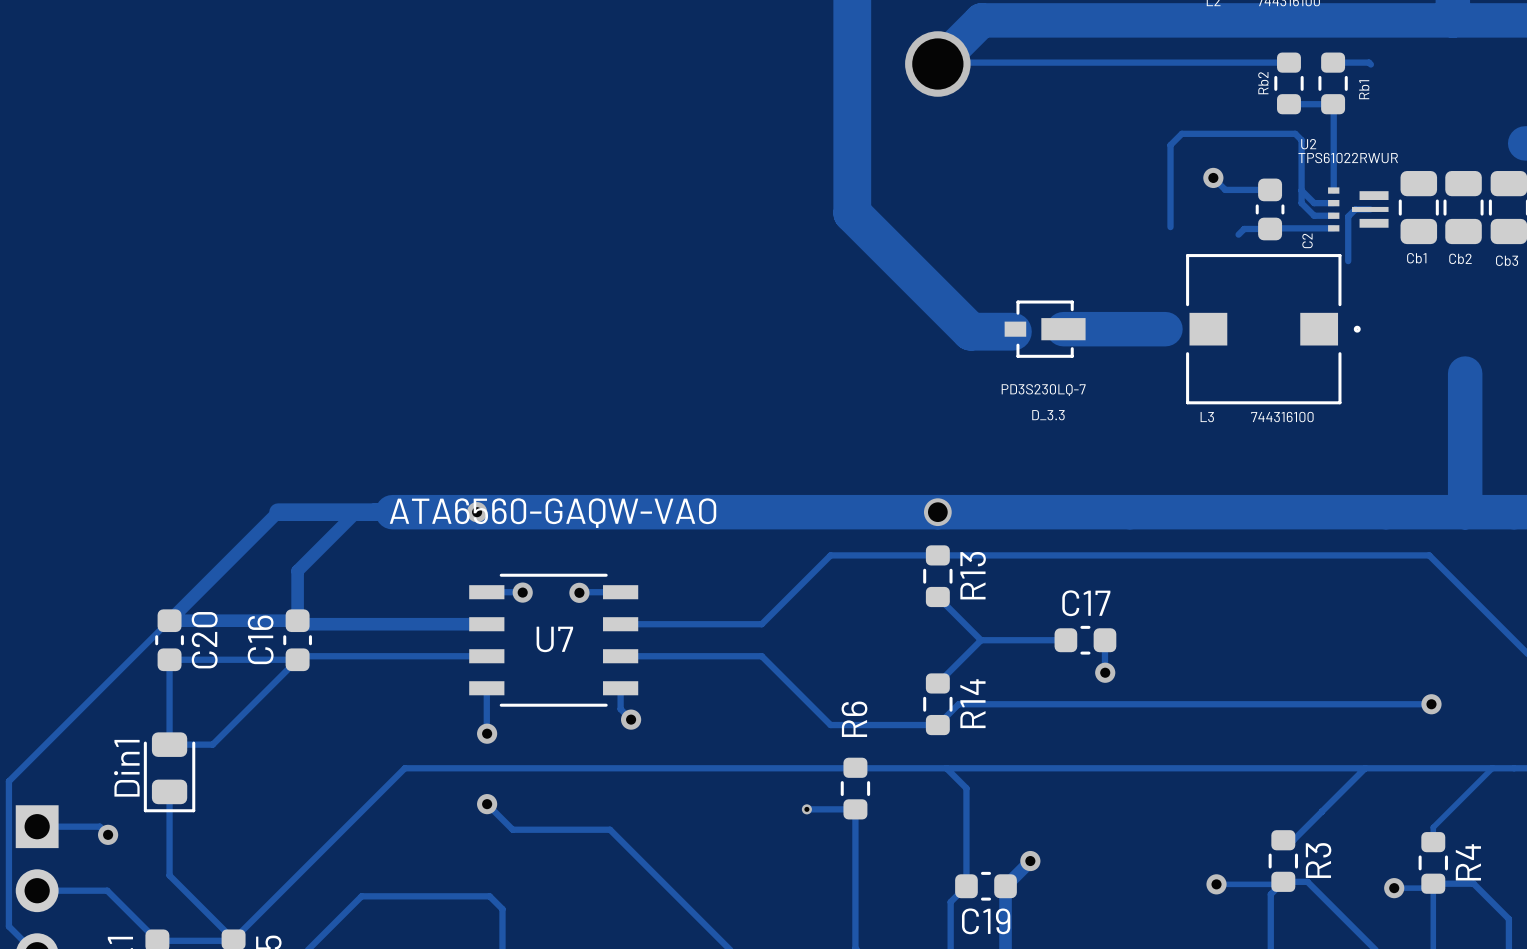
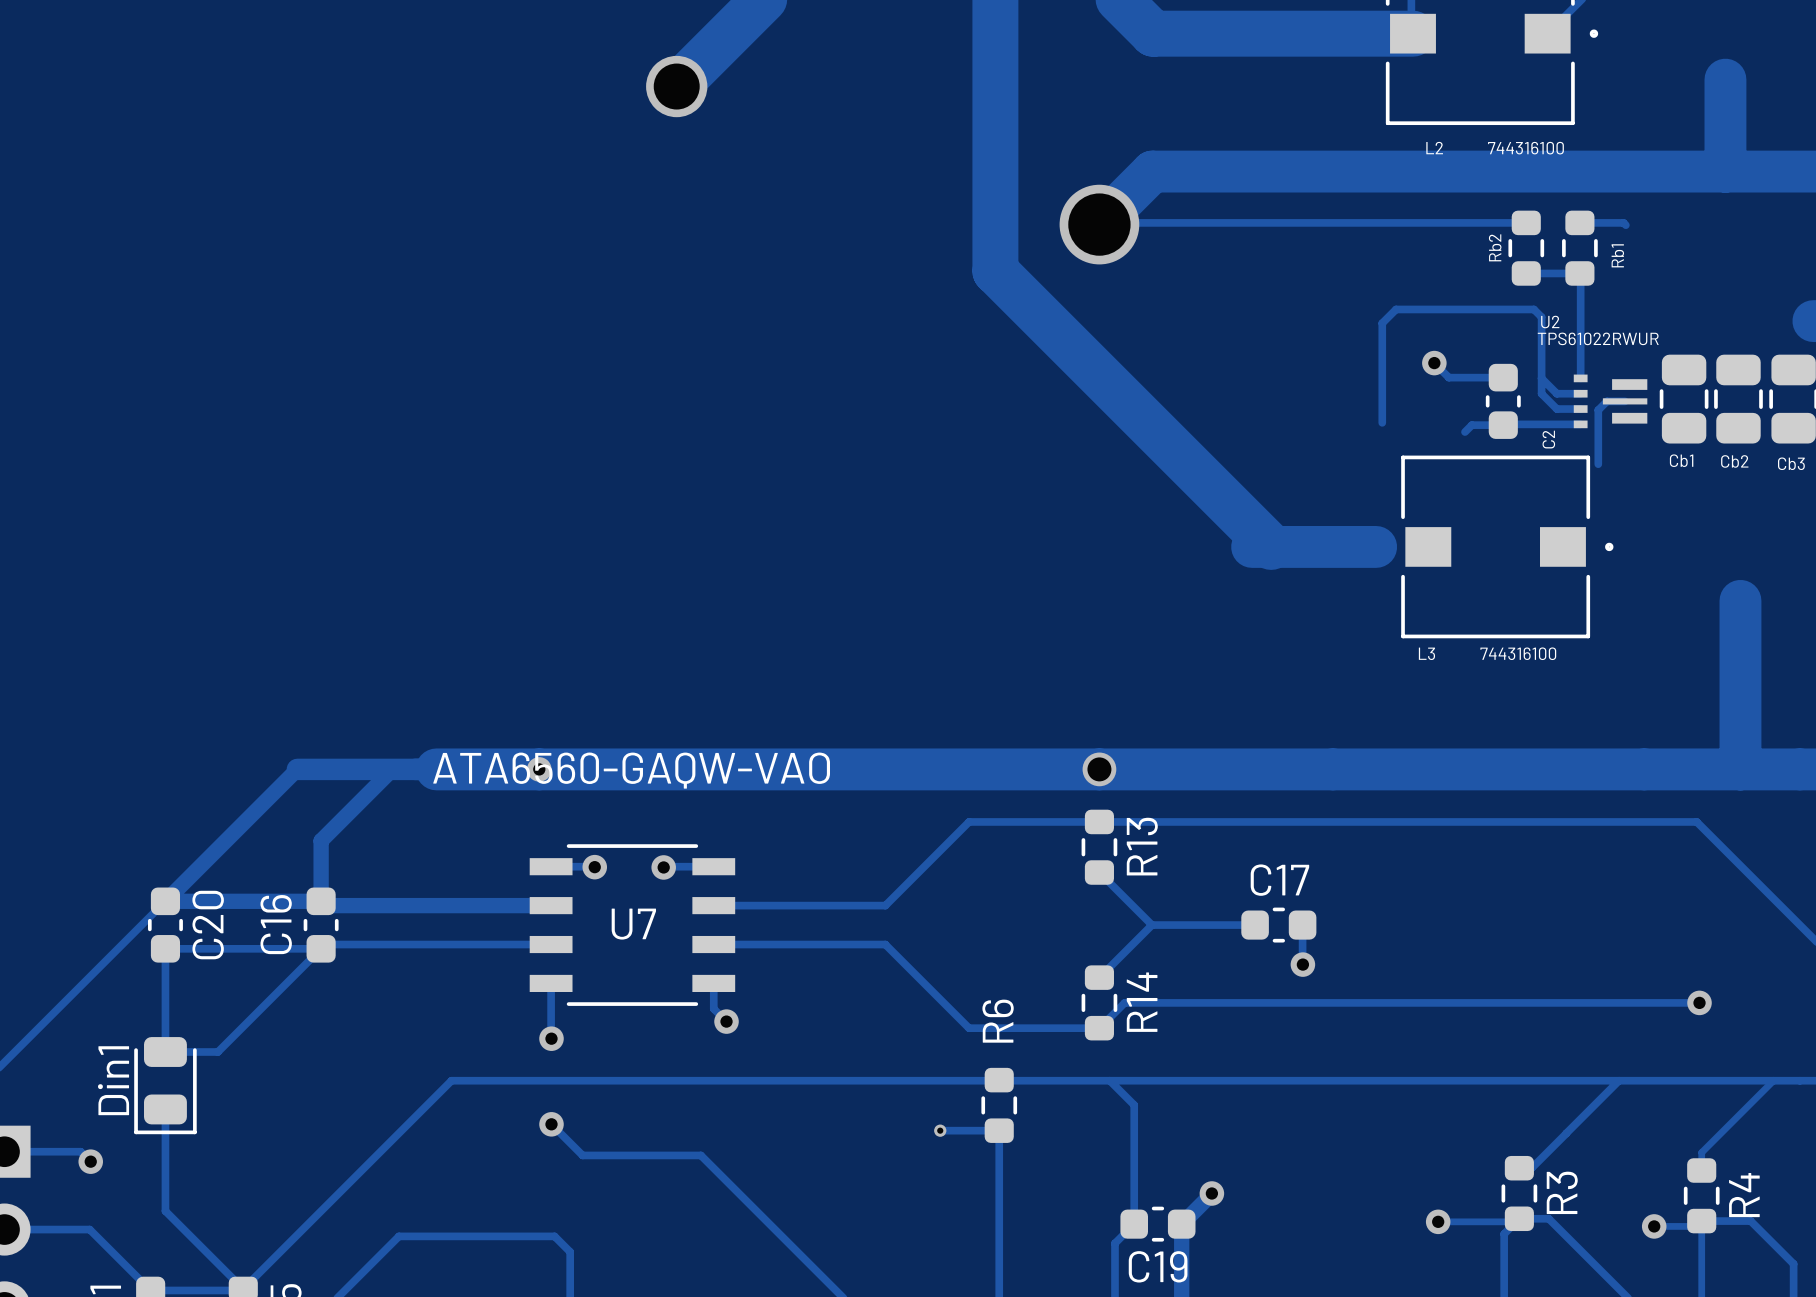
track: (852, 102) (852, 213) (970, 331) (1012, 331) -> (995, 271) (1271, 546)
D_3.3: PD3S230LQ-7 (1045, 329) -> none

